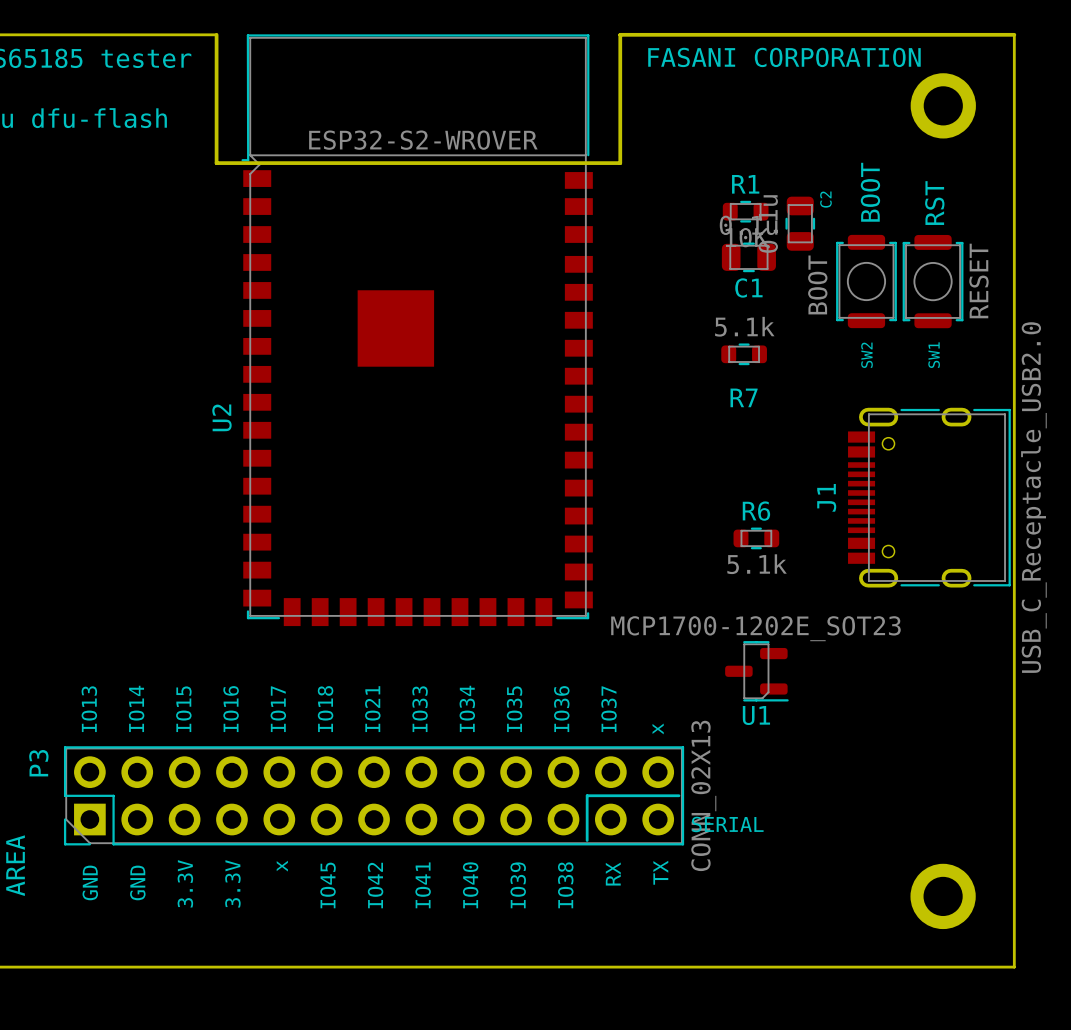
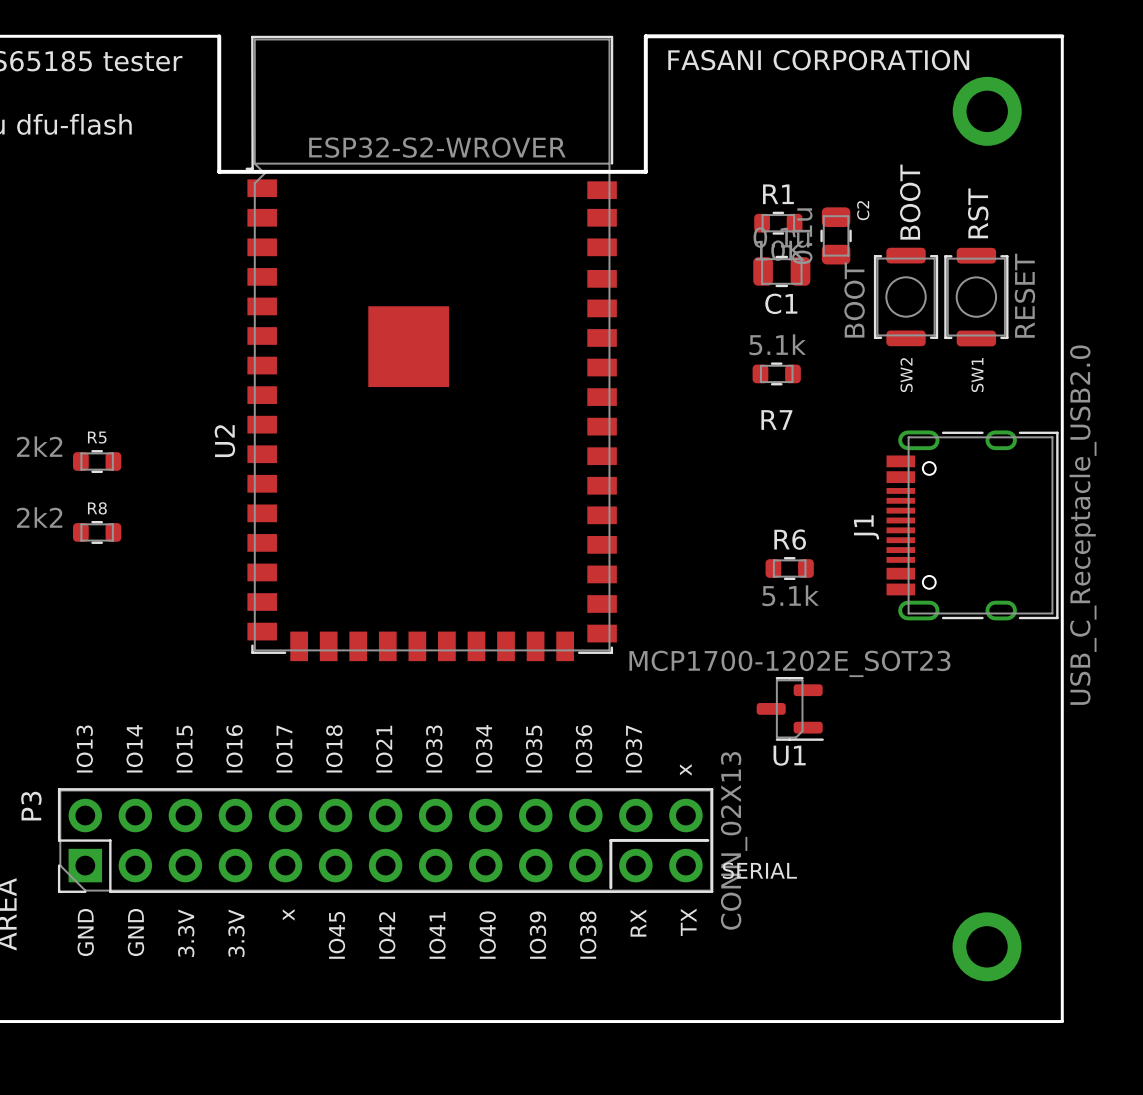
R5: none -> 2k2 (97, 461)
R8: none -> 2k2 (97, 532)

